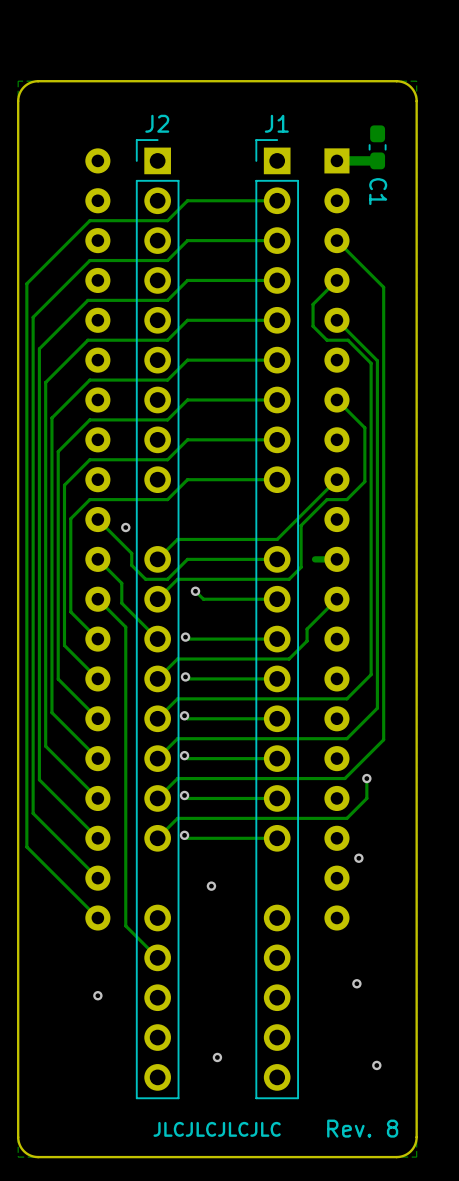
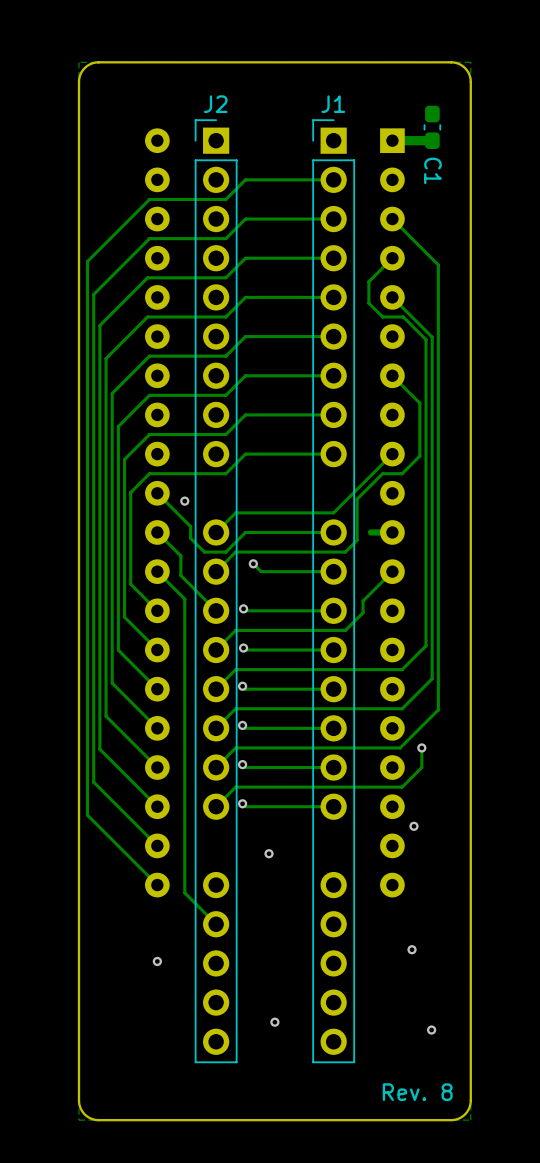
text: JLCJLCJLCJLC (217, 1129) -> none

